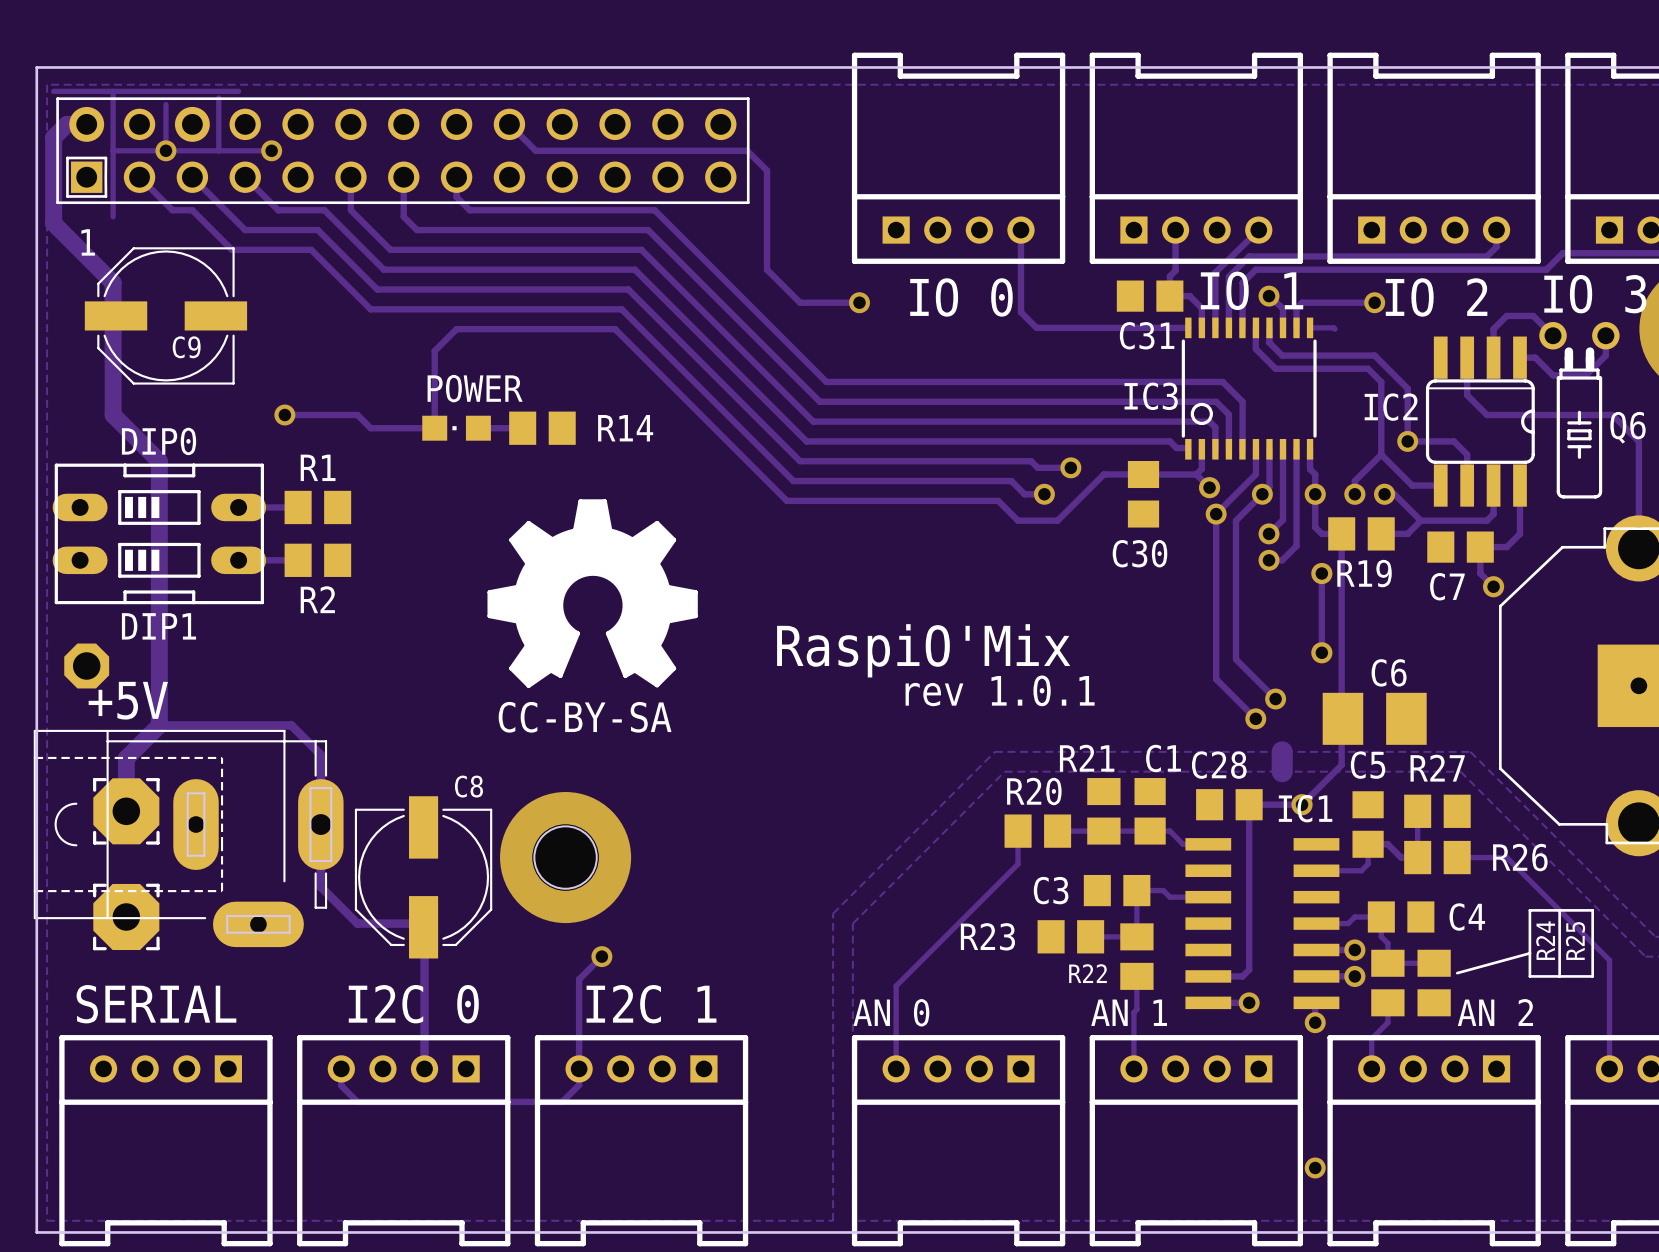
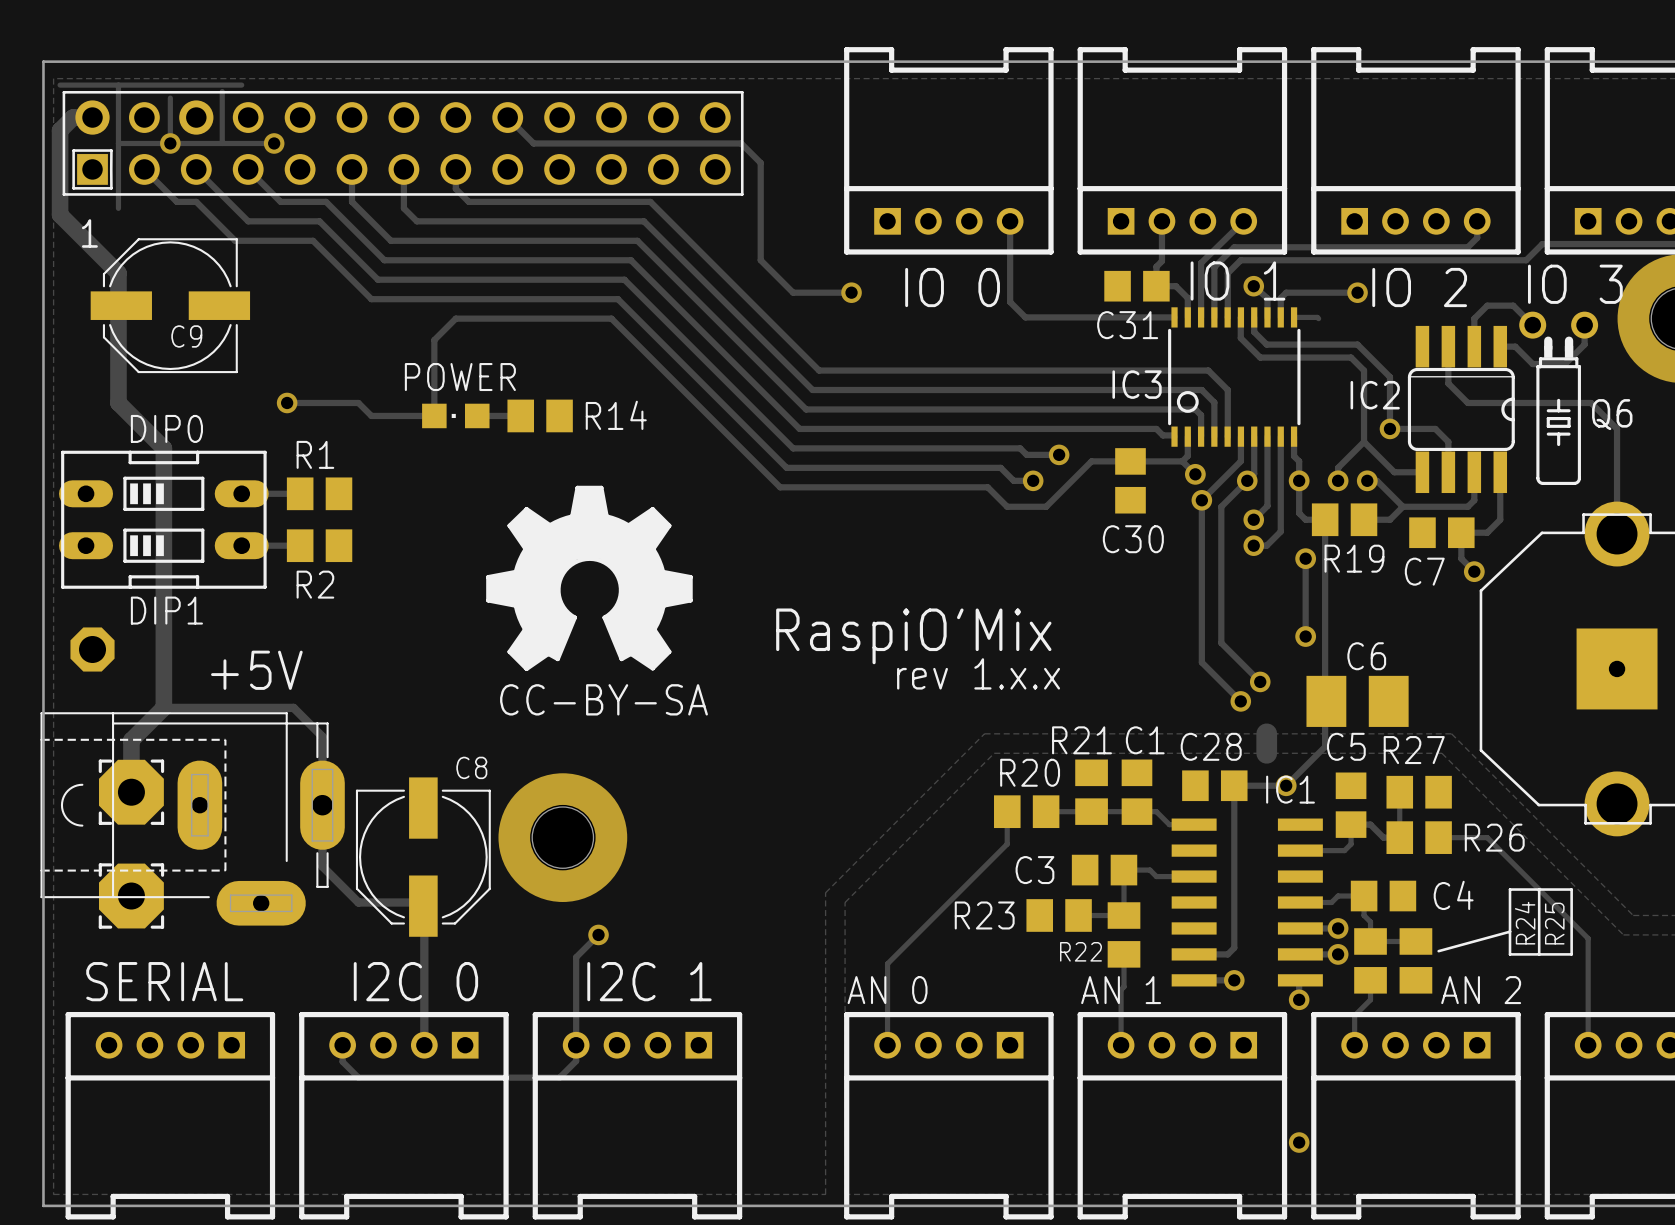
text: rev 1.0.1 (1000, 690) -> rev 1.x.x (978, 673)
text position: +5V (128, 700) -> +5V (256, 670)

